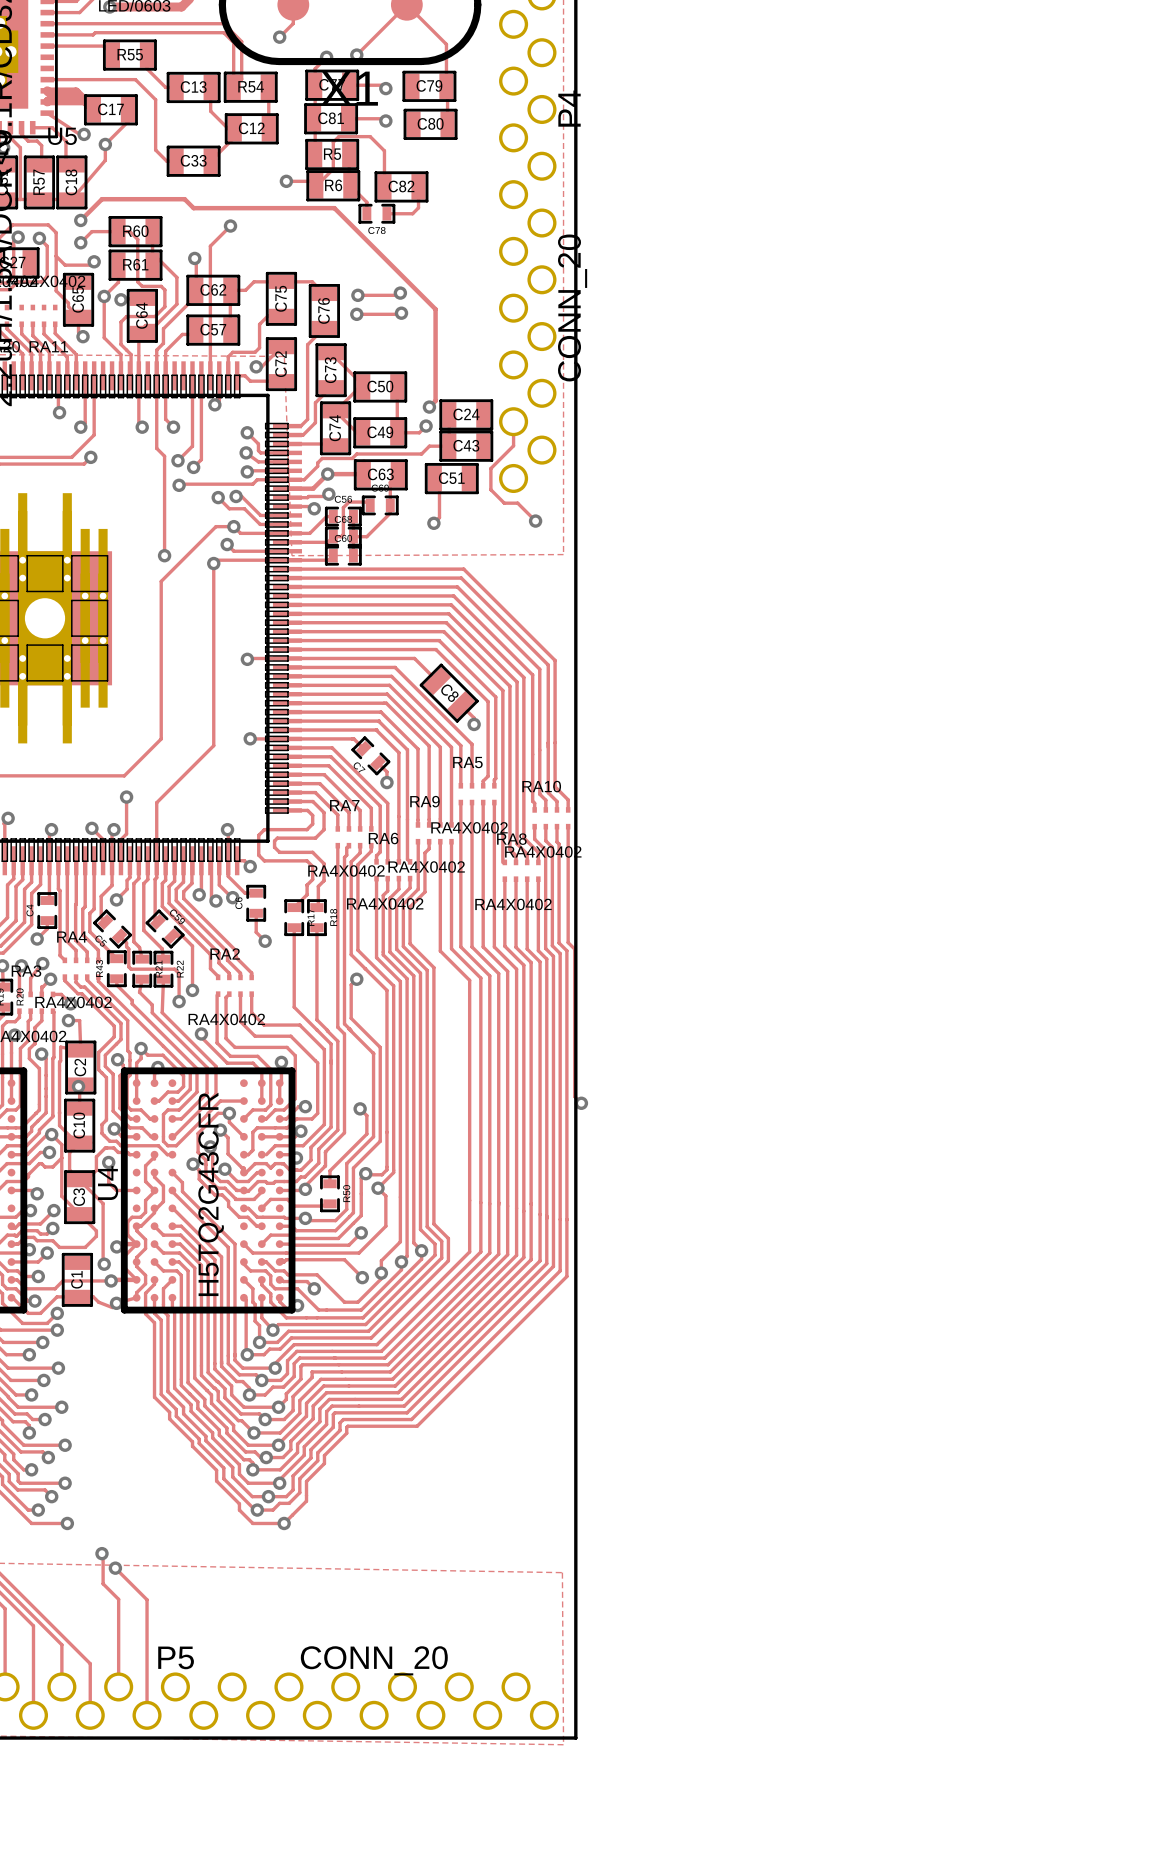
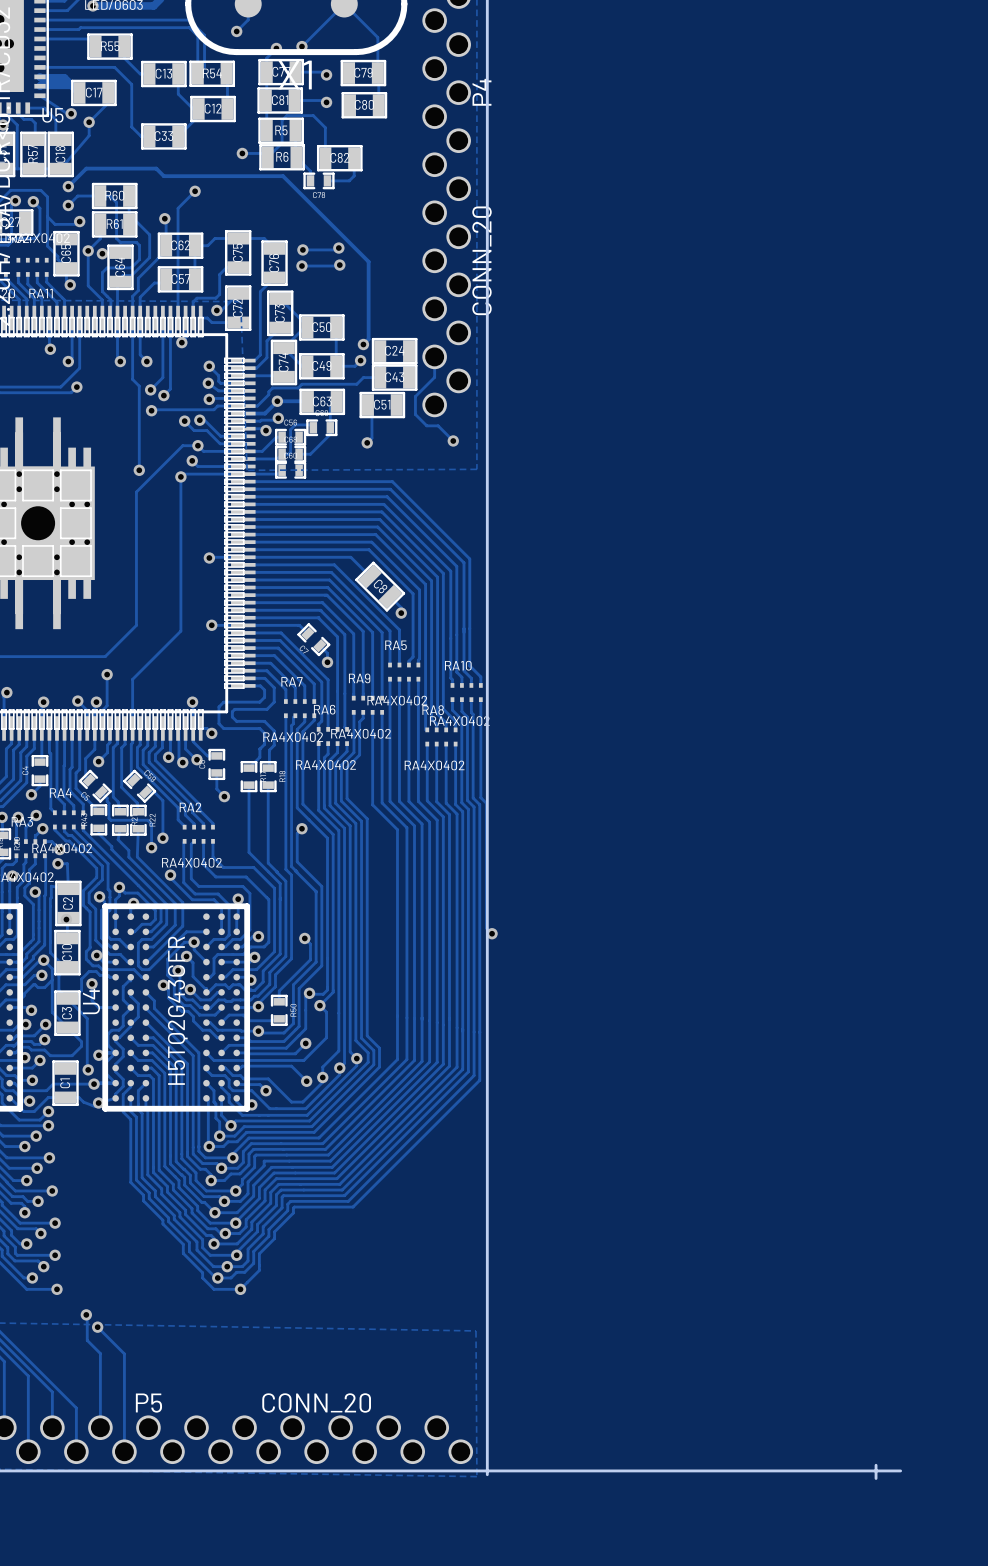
board edge: none -> (876, 1465) (876, 1478)
board edge: none -> (900, 1470) (487, 1470) (487, 1474)

